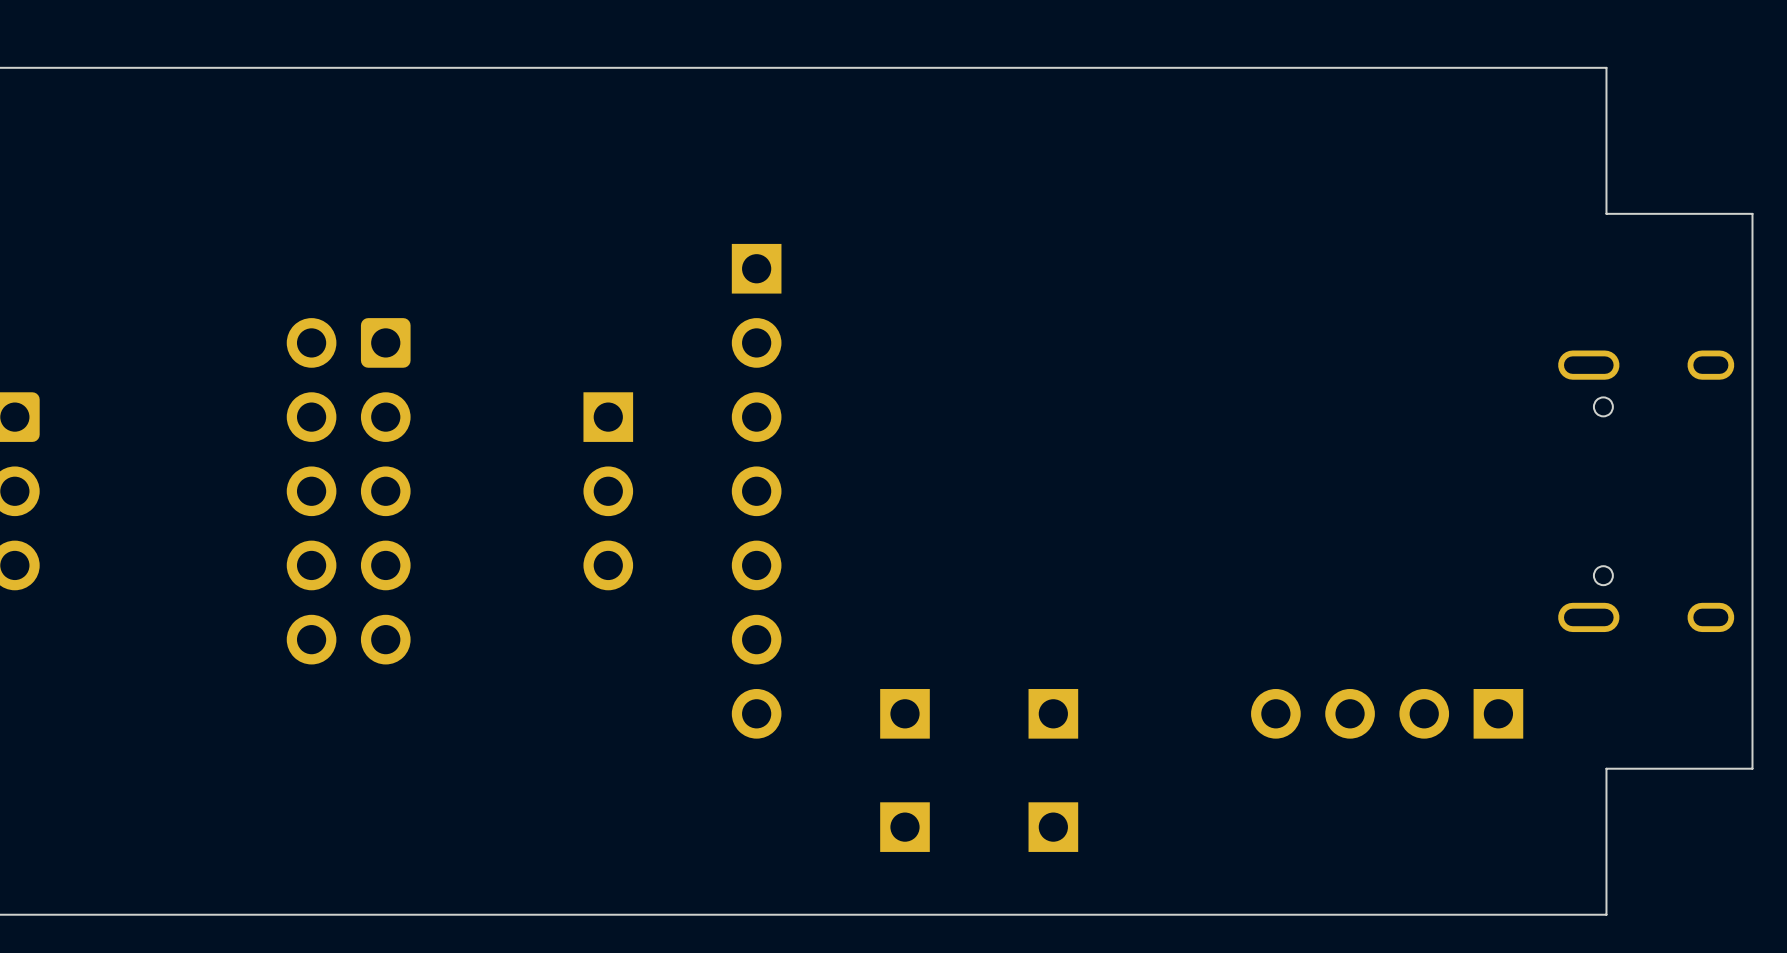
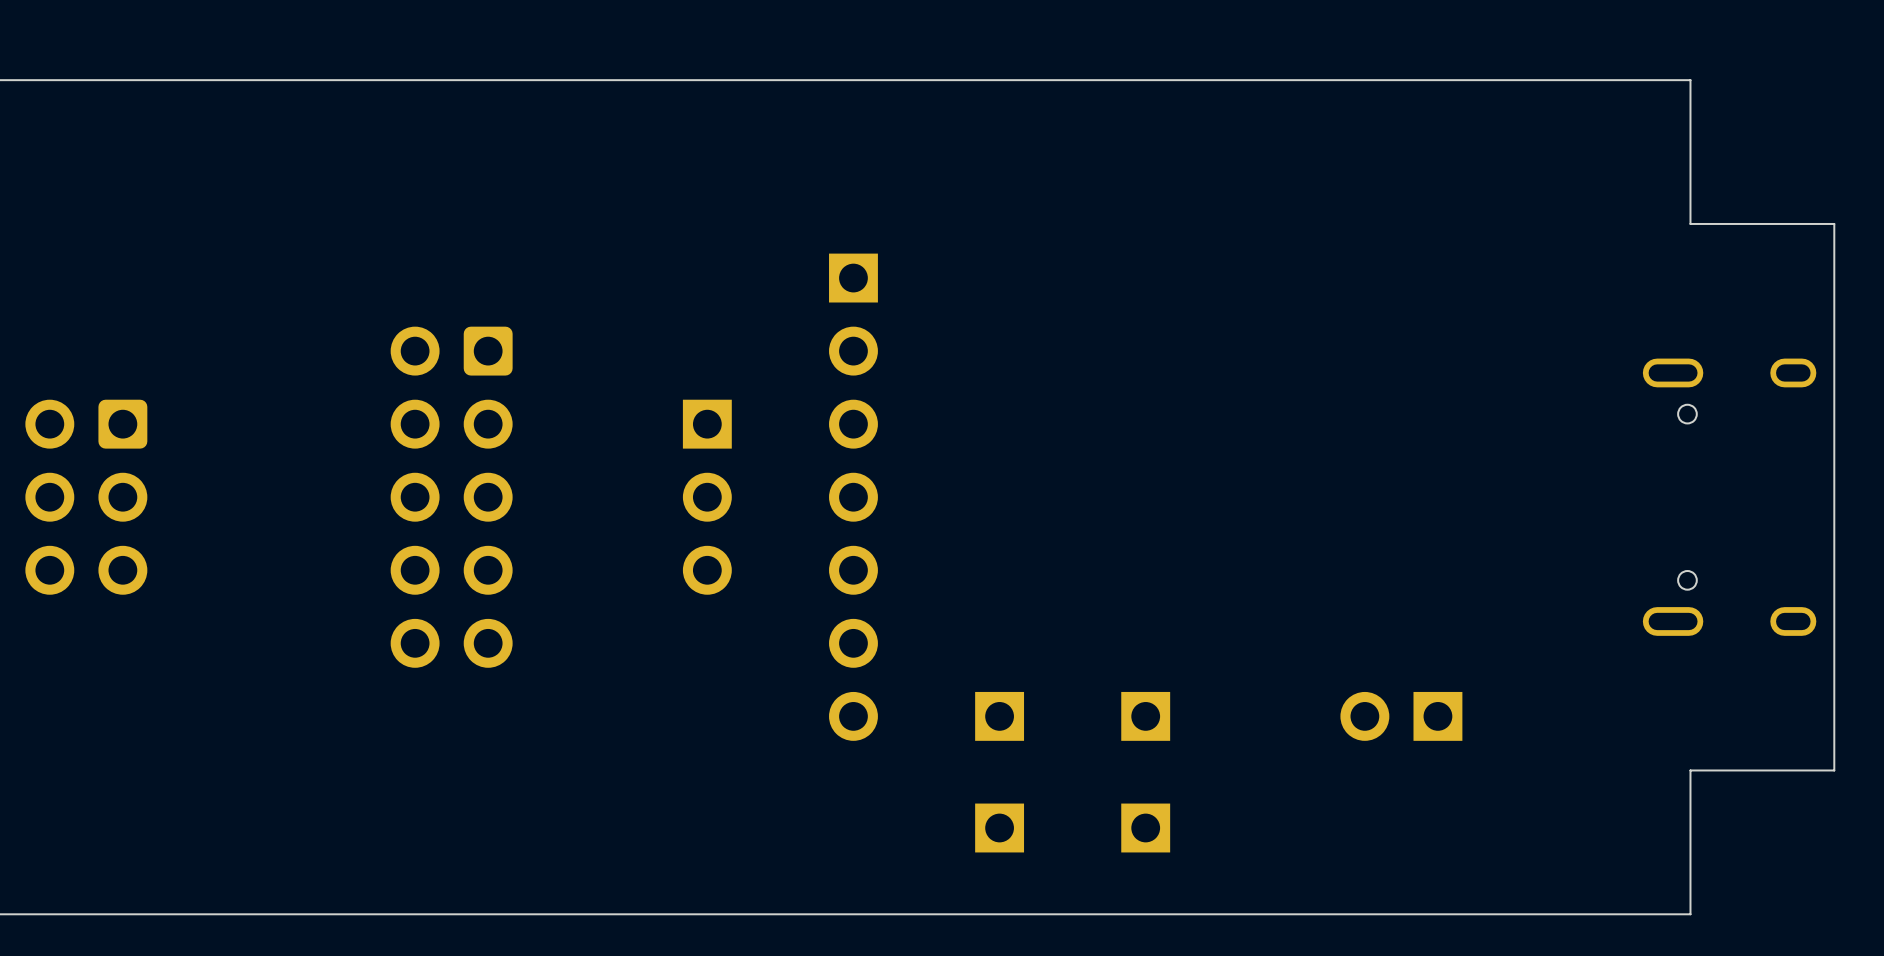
part: none -> (1401, 716)
part: (1387, 713) -> none

